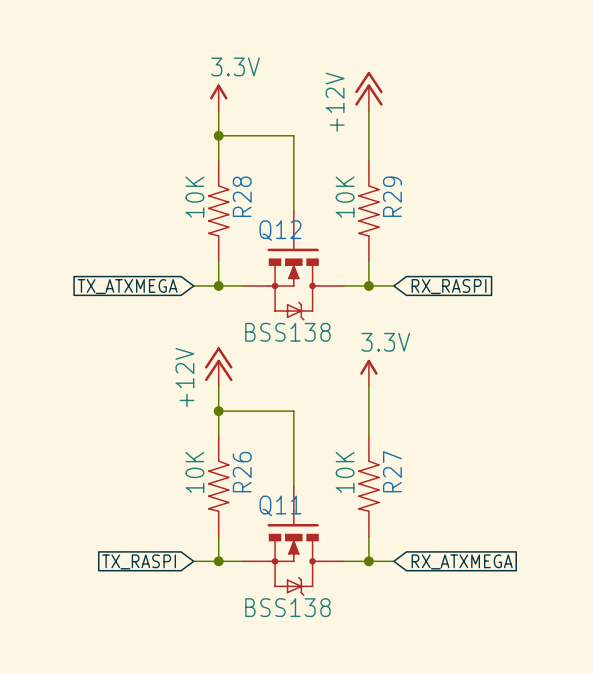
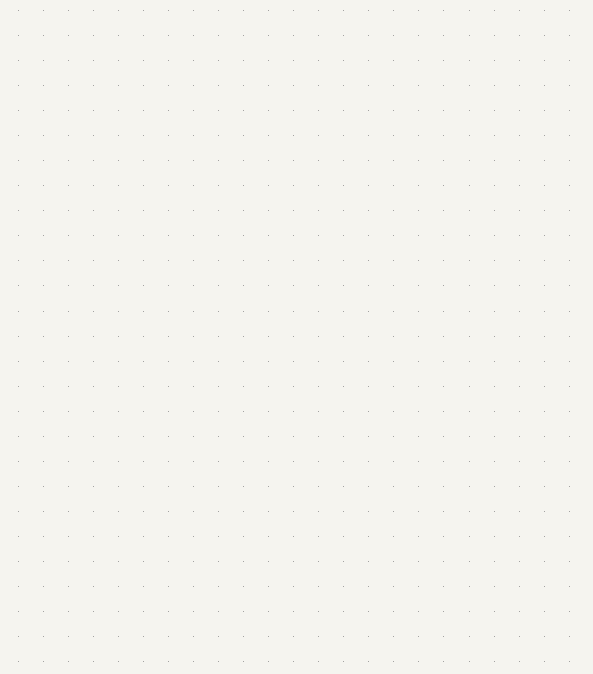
power symbol: +12V (368, 91) -> none
power symbol: 3.3V (218, 97) -> none
wire: (218, 110) (218, 160) -> none
wire: (368, 110) (368, 160) -> none
wire: (218, 135) (293, 135) (293, 210) -> none
junction: (218, 135) -> none
R28: 10K (218, 210) -> none
R29: 10K (368, 210) -> none
wire: (218, 260) (218, 285) -> none
wire: (368, 260) (368, 285) -> none
Q12: BSS138 (293, 265) -> none
wire: (193, 285) (243, 285) -> none
junction: (218, 285) -> none
wire: (343, 285) (393, 285) -> none
junction: (368, 285) -> none
global label: TX_ATXMEGA (127, 286) -> none
global label: RX_RASPI (449, 286) -> none
power symbol: +12V (218, 366) -> none
power symbol: 3.3V (368, 372) -> none
wire: (218, 386) (218, 436) -> none
wire: (368, 386) (368, 436) -> none
wire: (218, 411) (293, 411) (293, 486) -> none
junction: (218, 411) -> none
R26: 10K (218, 486) -> none
R27: 10K (368, 486) -> none
wire: (218, 536) (218, 561) -> none
wire: (368, 536) (368, 561) -> none
Q11: BSS138 (293, 541) -> none
global label: TX_RASPI (139, 561) -> none
wire: (193, 561) (243, 561) -> none
junction: (218, 561) -> none
wire: (343, 561) (393, 561) -> none
junction: (368, 561) -> none
global label: RX_ATXMEGA (462, 561) -> none

